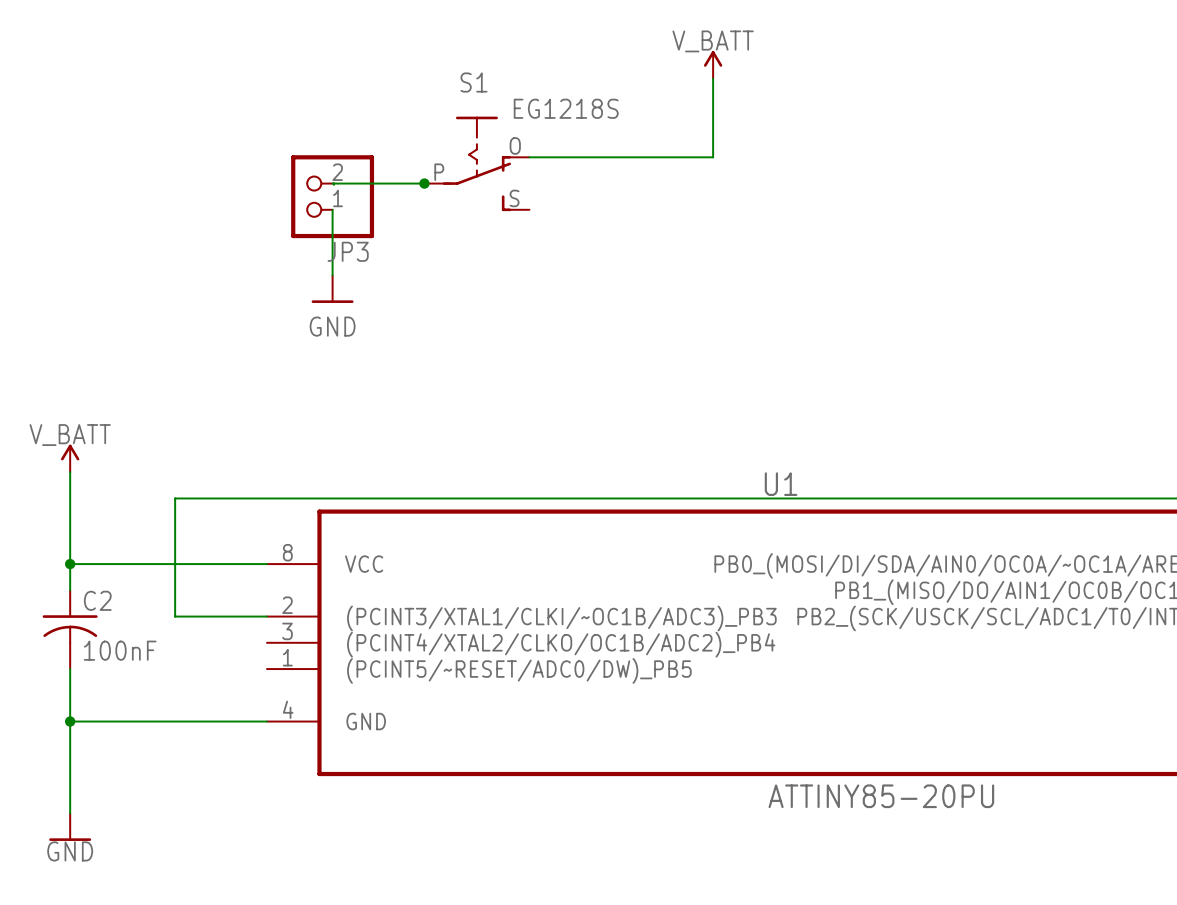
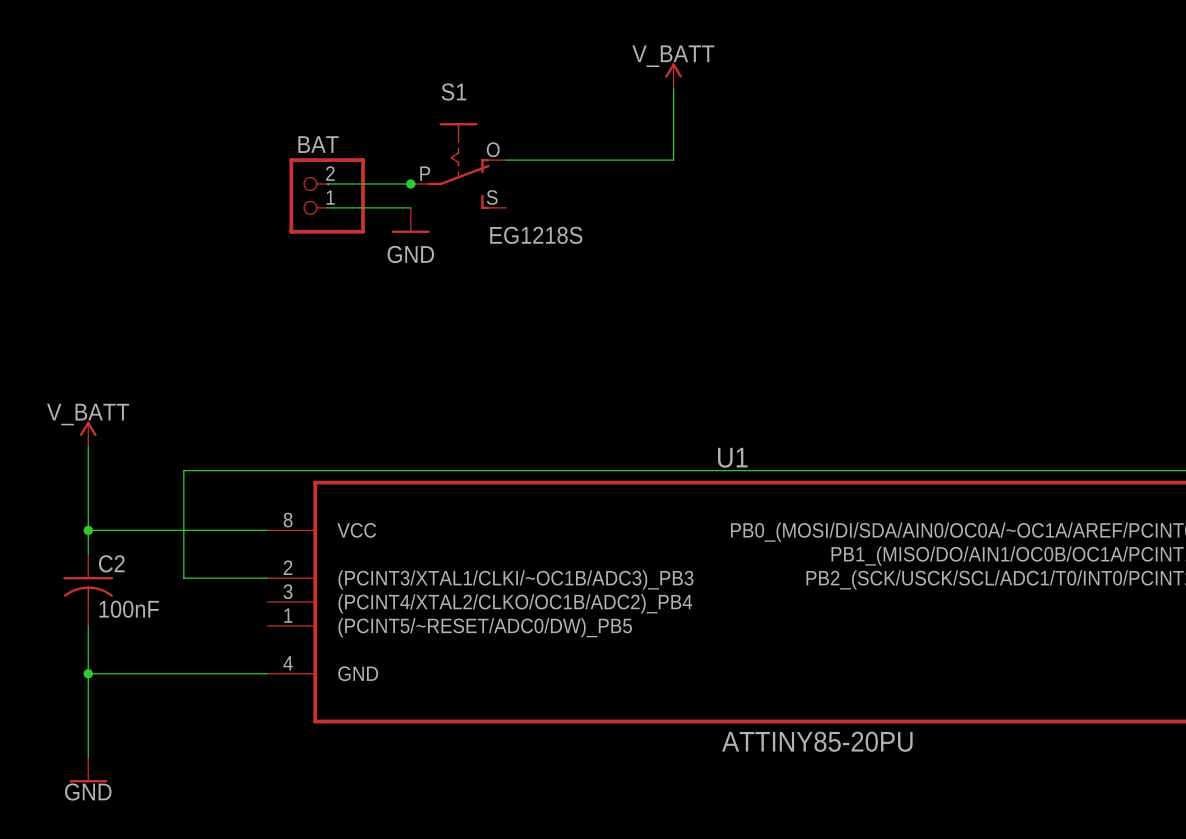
S1 value position: EG1218S (566, 108) -> EG1218S (536, 235)
wire: (332, 209) (332, 275) -> (327, 207) (410, 207)
JP3 name: JP3 (348, 251) -> BAT (318, 144)
power symbol position: GND (332, 289) -> GND (410, 220)

